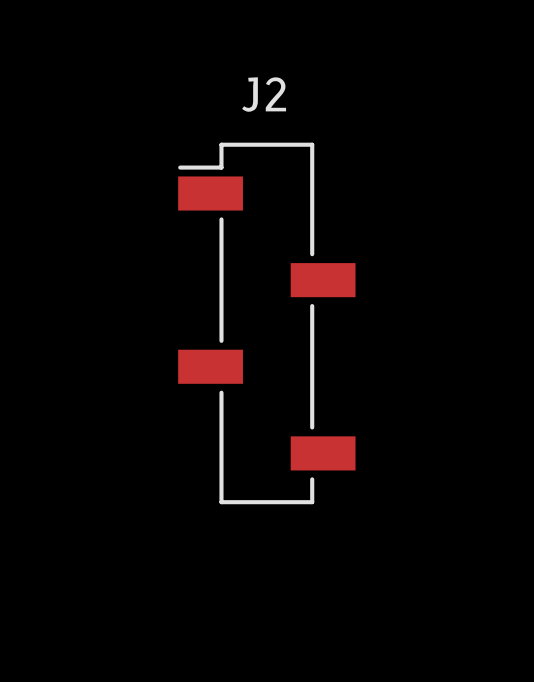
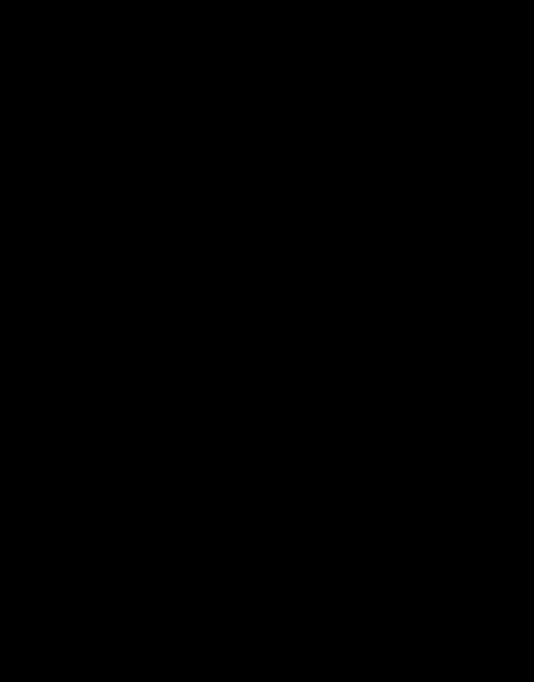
J2: (266, 323) -> none

